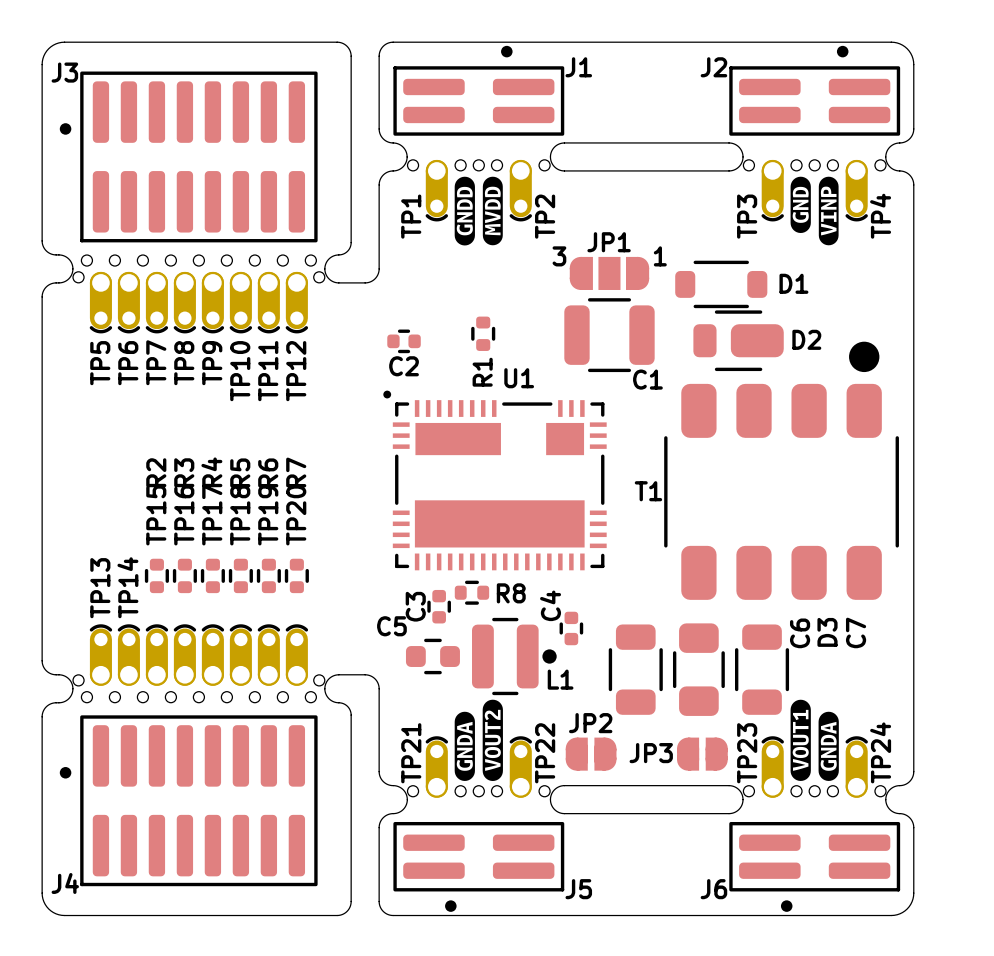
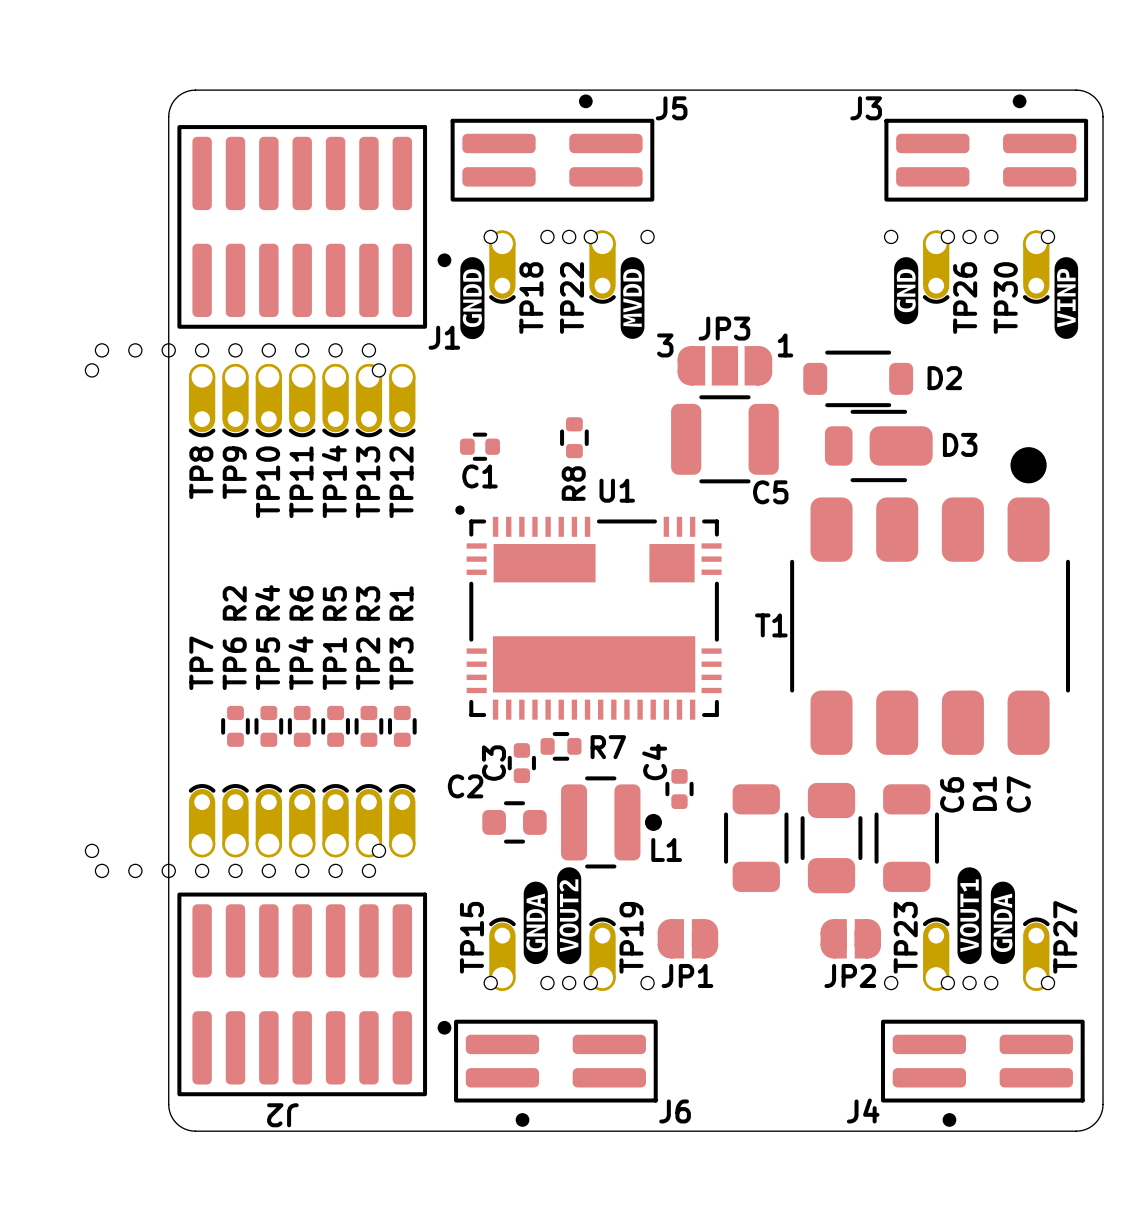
board edge: (165, 42) (61, 42) (53, 45) (46, 50) (42, 64) (42, 242) (48, 252) (67, 257) (72, 268) (70, 276) (66, 280) (51, 283) (46, 287) (42, 296) (42, 662) (48, 672) (67, 677) (72, 688) (67, 699) (48, 704) (42, 715) (42, 896) (48, 908) (61, 915) (165, 915) -> (195, 90) (185, 92) (176, 97) (170, 106) (168, 116) (168, 1104) (170, 1114) (176, 1123) (185, 1129) (195, 1131)
board edge: (337, 42) (347, 46) (351, 56) (351, 244) (346, 252) (328, 259) (324, 268) (328, 278) (338, 282) (368, 282) (377, 276) (379, 268) (379, 181) (385, 173) (401, 167) (406, 160) (406, 152) (403, 147) (385, 140) (379, 130) (379, 54) (383, 46) (393, 42) -> (400, 90) (467, 90)
board edge: (891, 42) (899, 43) (907, 48) (912, 56) (913, 64) (912, 133) (907, 140) (891, 146) (885, 156) (891, 167) (909, 175) (913, 184) (913, 771) (908, 782) (889, 789) (885, 799) (891, 810) (907, 815) (912, 823) (913, 893) (912, 901) (907, 908) (899, 913) (891, 915) -> (1060, 90) (1079, 90) (1089, 93) (1099, 103) (1103, 116) (1103, 1104) (1099, 1117) (1089, 1127) (1079, 1130) (1060, 1131)
J1 footprint: [393, 45, 565, 136] -> [177, 125, 452, 329]
J2 footprint: [729, 45, 901, 136] -> [177, 892, 452, 1097]
J1 name position: J1 (578, 67) -> J1 (444, 337)
J2 name position: J2 (713, 67) -> J2 (282, 1115)
J3 footprint: [59, 71, 318, 243] -> [884, 94, 1089, 202]
J3 name position: J3 (64, 72) -> J3 (866, 108)
board edge: (564, 142) (730, 143) (739, 148) (742, 158) (738, 166) (730, 170) (562, 170) (553, 165) (550, 155) (555, 146) (564, 142) -> none
TP1 rotation: 0° (436, 190) -> 180° (335, 820)
TP1 position: (436, 190) -> (335, 820)
TP2 rotation: 0° (520, 190) -> 180° (368, 820)
TP2 position: (520, 190) -> (368, 820)
TP3 rotation: 0° (772, 190) -> 180° (402, 820)
TP3 position: (772, 190) -> (402, 820)
TP26: none -> (936, 267)
TP4 rotation: 0° (856, 190) -> 180° (302, 820)
TP4 position: (856, 190) -> (302, 820)
TP30: none -> (1036, 267)
drawing position: (800, 204) -> (906, 290)
drawing position: (492, 210) -> (632, 298)
drawing position: (464, 211) -> (472, 298)
drawing position: (828, 211) -> (1066, 298)
TP1 name position: TP1 (411, 216) -> TP1 (334, 663)
TP2 name position: TP2 (545, 216) -> TP2 (368, 663)
TP3 name position: TP3 (747, 216) -> TP3 (401, 663)
TP4 name position: TP4 (880, 216) -> TP4 (300, 663)
JP1 name: JP1 (609, 242) -> JP3 (724, 328)
D1 name: D1 (793, 283) -> D2 (944, 378)
TP5 rotation: 0° (100, 302) -> 180° (268, 820)
TP5 position: (100, 302) -> (268, 820)
TP6 rotation: 0° (128, 302) -> 180° (235, 820)
TP6 position: (128, 302) -> (235, 820)
TP7 rotation: 0° (156, 302) -> 180° (202, 820)
TP7 position: (156, 302) -> (202, 820)
TP8 position: (184, 302) -> (202, 400)
TP9 position: (212, 302) -> (235, 400)
TP10 position: (240, 302) -> (268, 400)
TP11 position: (268, 302) -> (302, 400)
TP12 position: (296, 302) -> (402, 400)
D2 name: D2 (806, 339) -> D3 (960, 444)
TP7 name position: TP7 (156, 362) -> TP7 (201, 663)
TP5 name position: TP5 (100, 363) -> TP5 (268, 663)
TP6 name position: TP6 (128, 363) -> TP6 (234, 663)
C2 name: C2 (404, 366) -> C1 (480, 476)
R1 name: R1 (482, 372) -> R8 (573, 483)
C1 name: C1 (647, 379) -> C5 (770, 492)
TP15 name position: TP15 (156, 515) -> TP15 (471, 937)
TP18 name position: TP18 (240, 515) -> TP18 (531, 298)
TP19 name position: TP19 (268, 515) -> TP19 (631, 937)
R2 position: (156, 575) -> (235, 726)
R3 position: (184, 575) -> (368, 726)
R4 position: (212, 575) -> (268, 726)
R5 position: (240, 575) -> (335, 726)
R6 position: (268, 575) -> (302, 726)
R7: (296, 575) -> none
R1: none -> (402, 726)
R8 name: R8 (511, 593) -> R7 (608, 747)
C5 name: C5 (391, 626) -> C2 (465, 786)
D3 name: D3 (827, 632) -> D1 (984, 793)
TP13 rotation: 0° (100, 655) -> 180° (368, 400)
TP13 position: (100, 655) -> (368, 400)
TP14 rotation: 0° (128, 655) -> 180° (335, 400)
TP14 position: (128, 655) -> (335, 400)
TP15 position: (156, 655) -> (502, 954)
TP16: (184, 655) -> none
TP17: (212, 655) -> none
TP18 rotation: 0° (240, 655) -> 180° (502, 267)
TP18 position: (240, 655) -> (502, 267)
TP19 position: (268, 655) -> (602, 954)
TP20: (296, 655) -> none
J4 footprint: [59, 715, 318, 887] -> [880, 1019, 1085, 1127]
JP2 name position: JP2 (590, 723) -> JP2 (850, 975)
drawing position: (492, 740) -> (569, 915)
drawing position: (800, 740) -> (969, 915)
drawing position: (464, 746) -> (535, 922)
drawing position: (828, 746) -> (1002, 922)
TP24 name: TP24 (880, 752) -> TP27 (1065, 937)
JP1: none -> (687, 938)
JP2 position: (591, 754) -> (850, 938)
JP3: (702, 754) -> none
TP21: (436, 766) -> none
TP22 rotation: 0° (520, 766) -> 180° (602, 267)
TP22 position: (520, 766) -> (602, 267)
TP23 position: (772, 766) -> (936, 954)
TP24 position: (856, 766) -> (1036, 954)
board edge: (393, 785) (383, 781) (379, 773) (379, 688) (377, 681) (366, 674) (337, 674) (331, 676) (325, 684) (326, 694) (332, 701) (346, 705) (351, 715) (351, 903) (347, 911) (337, 915) -> none
board edge: (393, 785) (403, 789) (407, 799) (403, 809) (393, 813) -> none
board edge: (564, 785) (730, 785) (739, 790) (742, 801) (738, 809) (730, 813) (562, 813) (553, 808) (550, 798) (555, 788) (564, 785) -> none
board edge: (393, 813) (383, 817) (379, 827) (379, 903) (383, 911) (393, 915) -> (400, 1131) (467, 1131)
J5 rotation: 0° (478, 866) -> 180° (552, 148)
J5 position: (478, 866) -> (552, 148)
J6 position: (814, 866) -> (555, 1073)
J4 name position: J4 (65, 883) -> J4 (863, 1111)
J5 name position: J5 (578, 889) -> J5 (671, 108)
J6 name position: J6 (713, 889) -> J6 (675, 1111)

